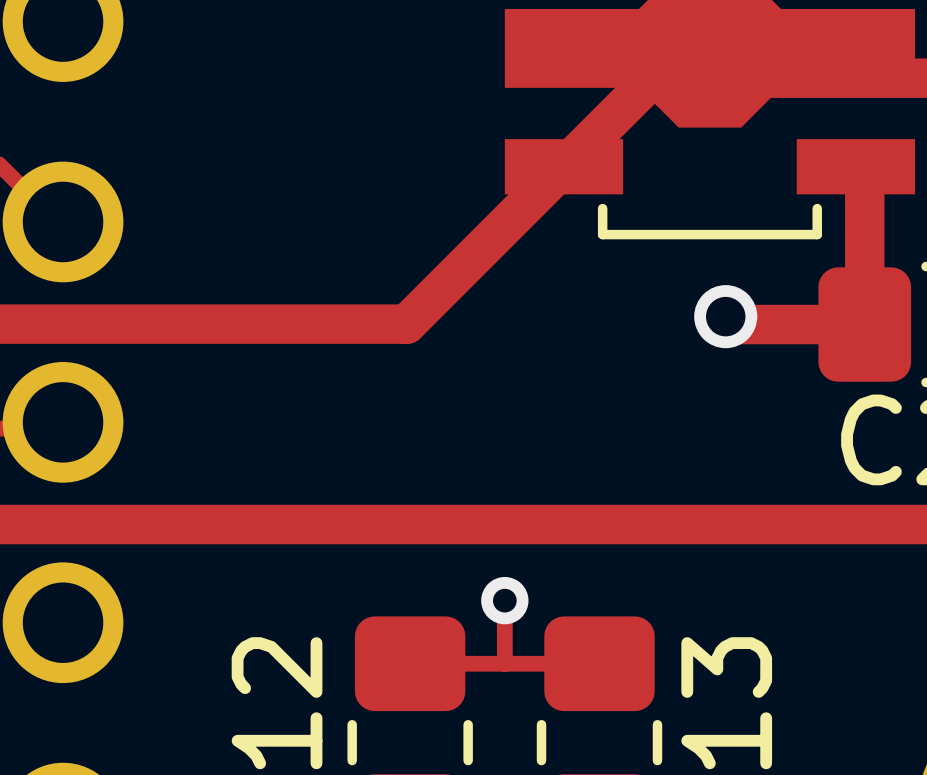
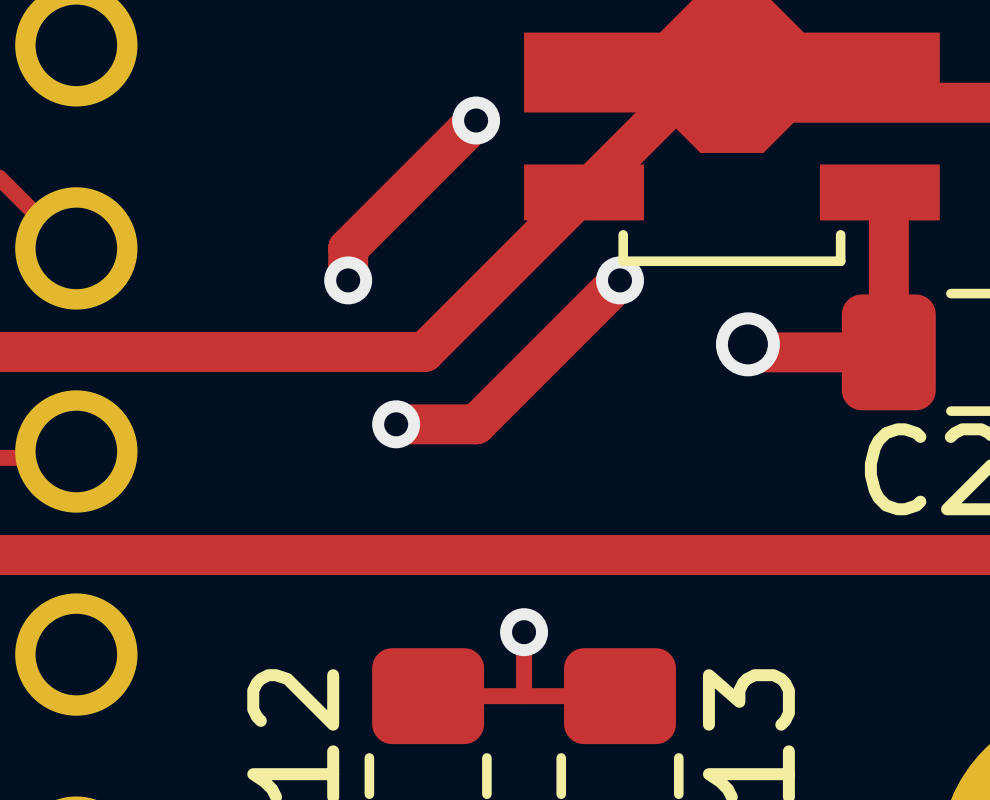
track: none -> (476, 120) (348, 248) (348, 280)
via: none -> (476, 120)
via: none -> (348, 280)
track: none -> (620, 280) (476, 424) (396, 424)
via: none -> (620, 280)
via: none -> (396, 424)

